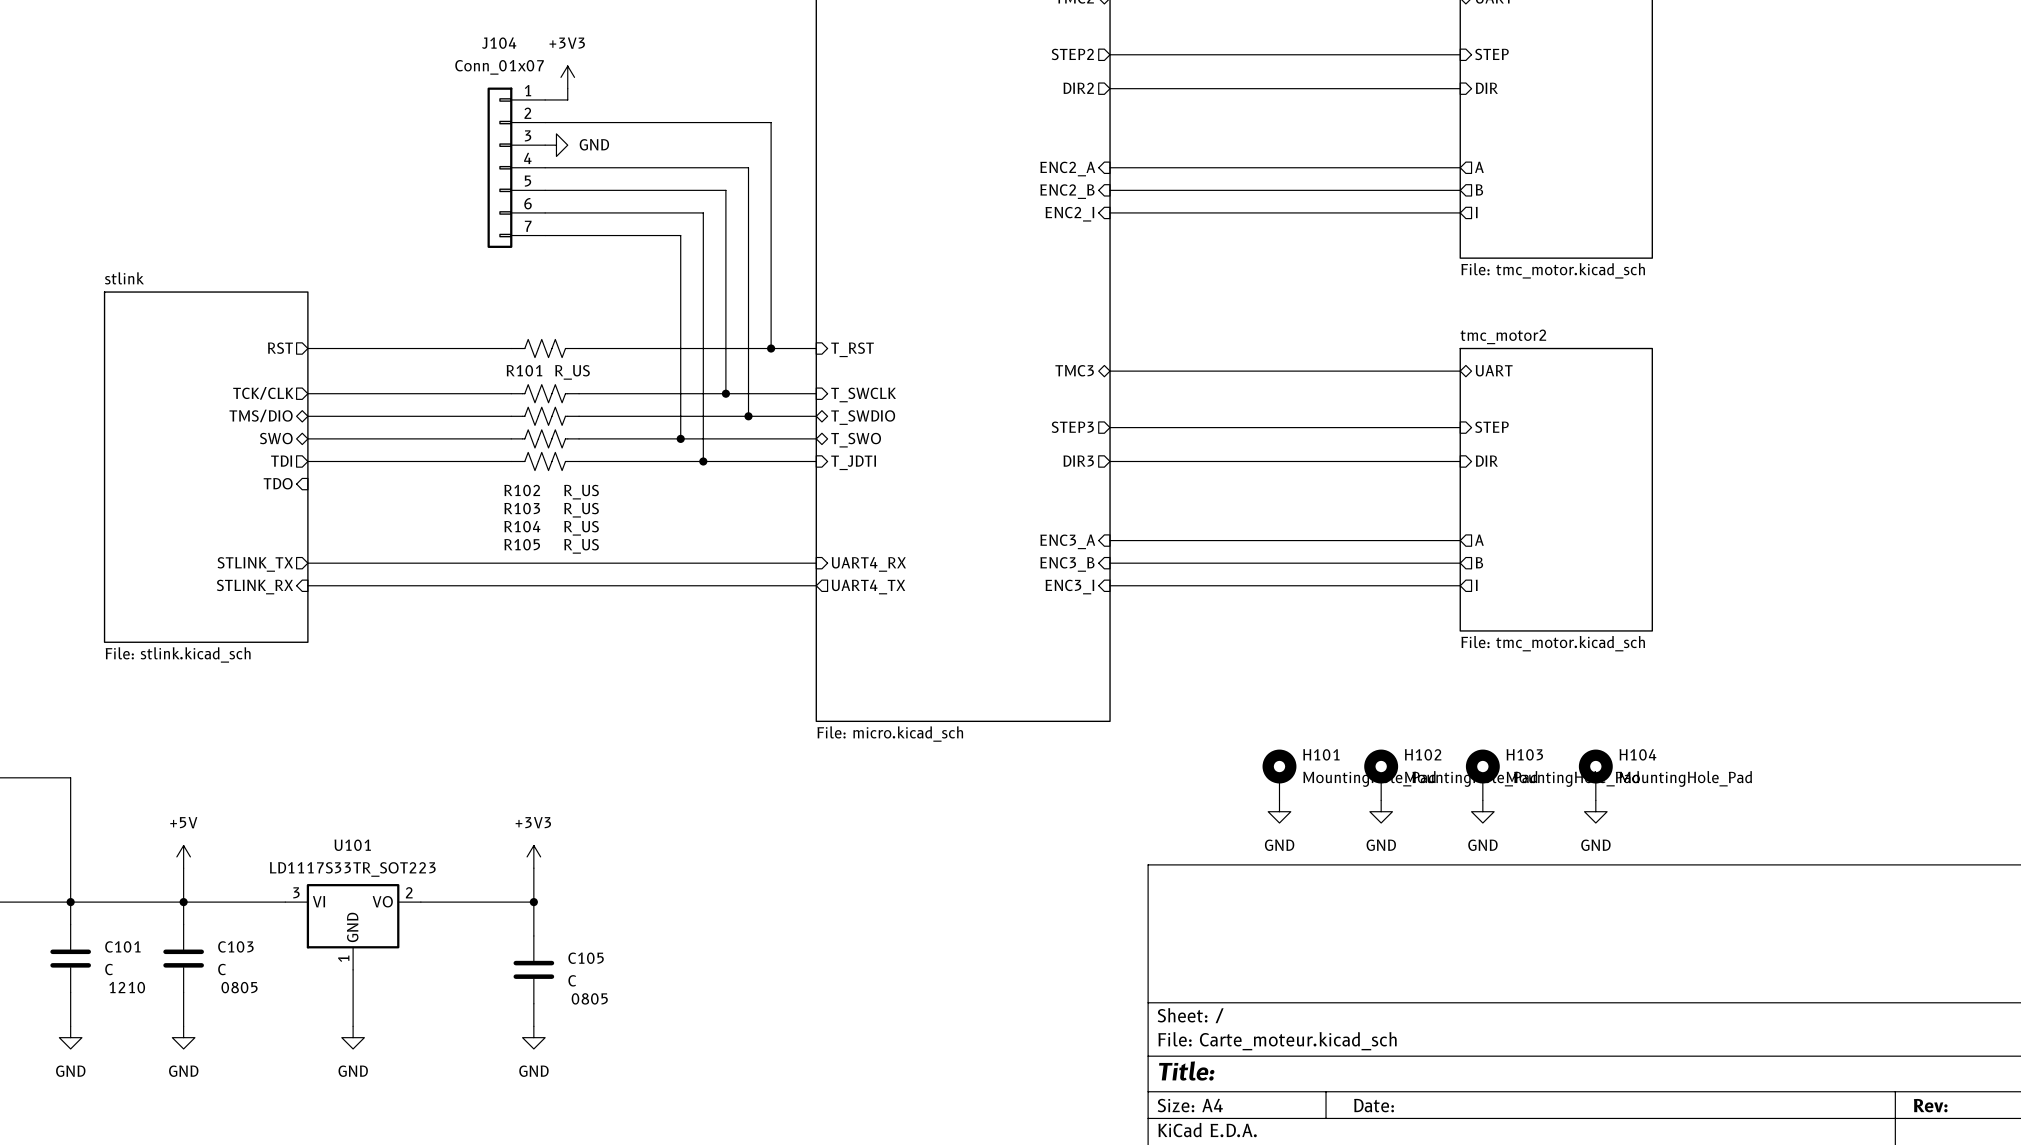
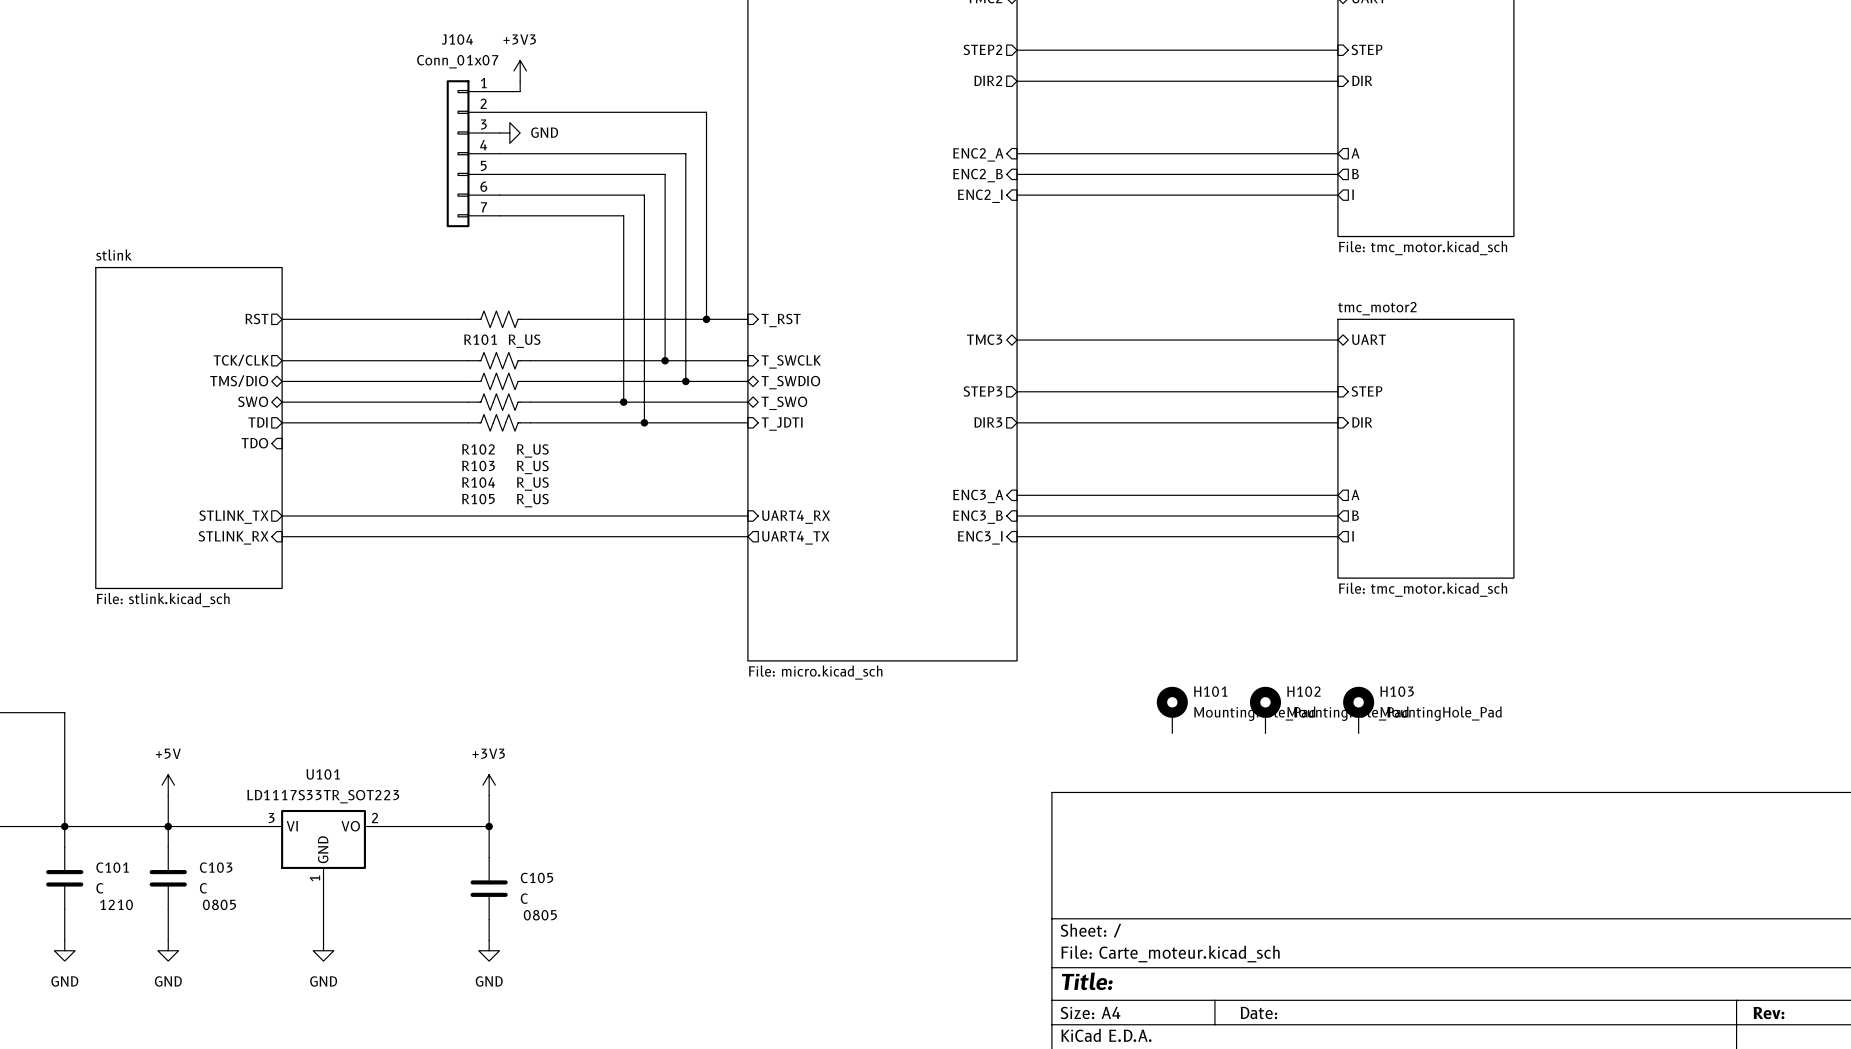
H104: MountingHole_Pad (1595, 775) -> none
power symbol: GND (1279, 811) -> none
power symbol: GND (1381, 811) -> none
power symbol: GND (1482, 811) -> none
power symbol: GND (1595, 811) -> none

